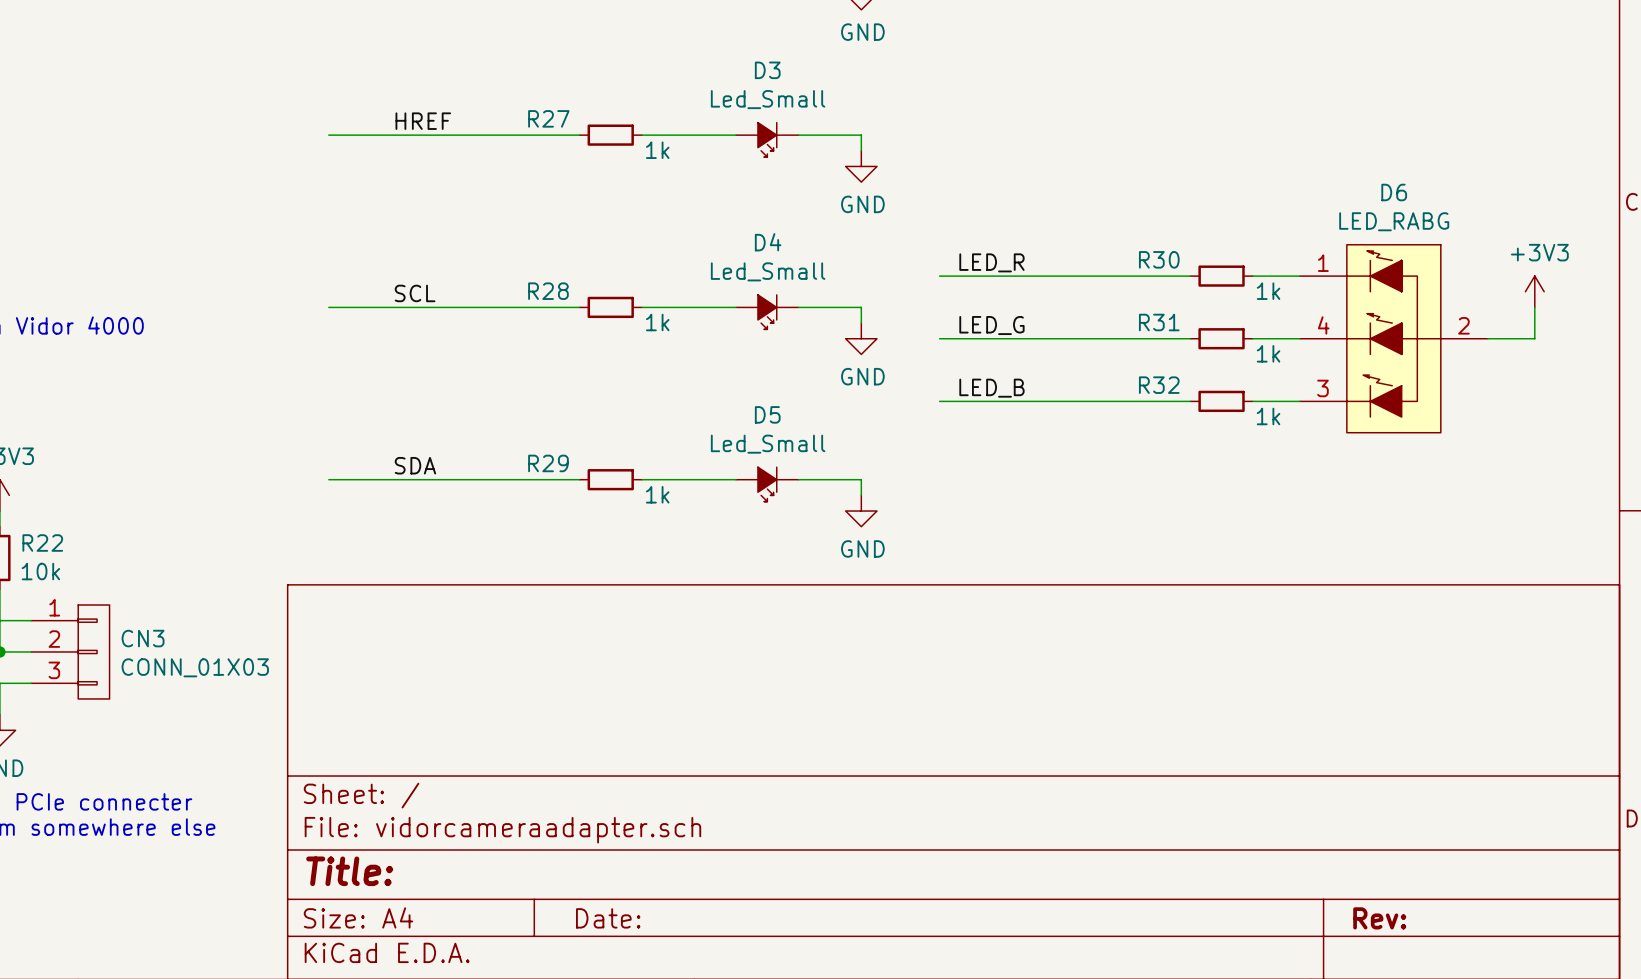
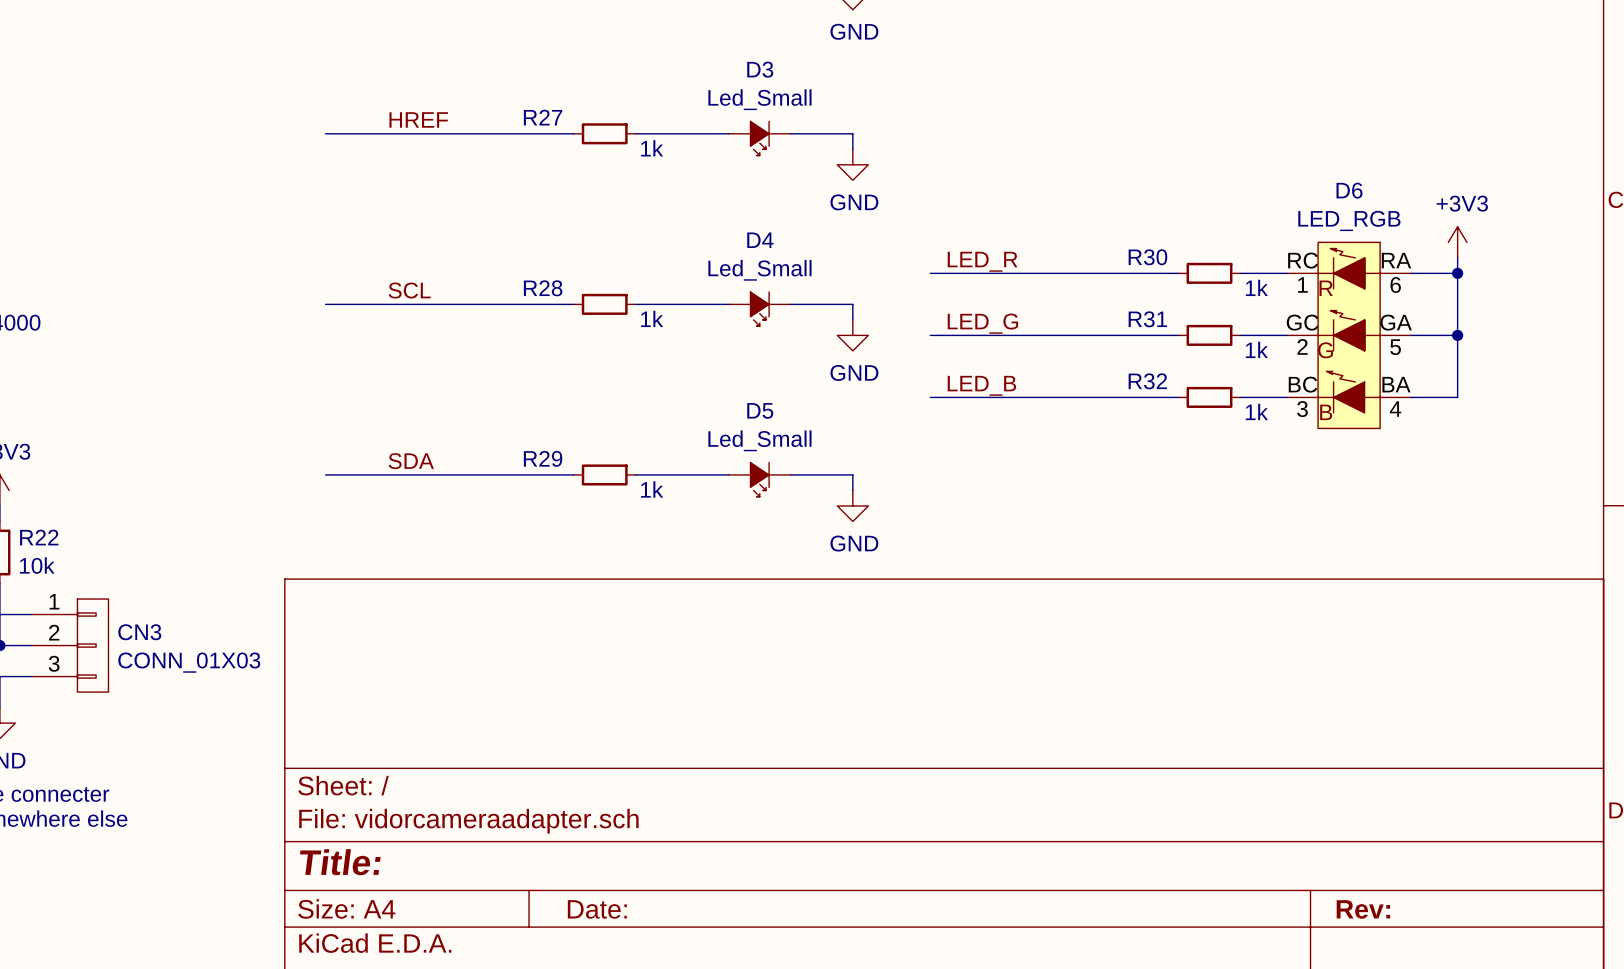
D6 value: LED_RABG (1394, 221) -> LED_RGB (1349, 220)
D6 symbol: [1299, 244, 1488, 433] -> [1287, 242, 1412, 429]
wire: none -> (1457, 257) (1457, 397) (1411, 397)
wire: none -> (1411, 273) (1457, 273)
junction: none -> (1457, 273)
power symbol position: +3V3 (1534, 291) -> +3V3 (1457, 242)
wire: (1534, 307) (1534, 338) (1487, 338) -> none
junction: none -> (1457, 335)

